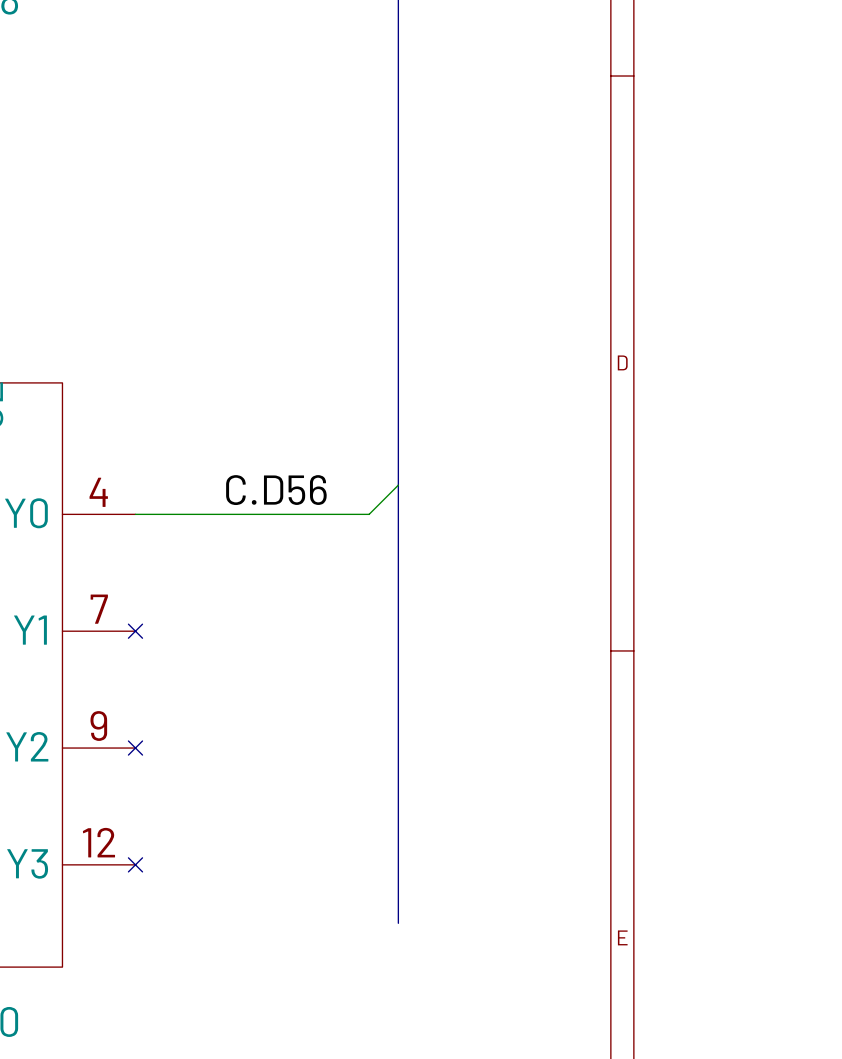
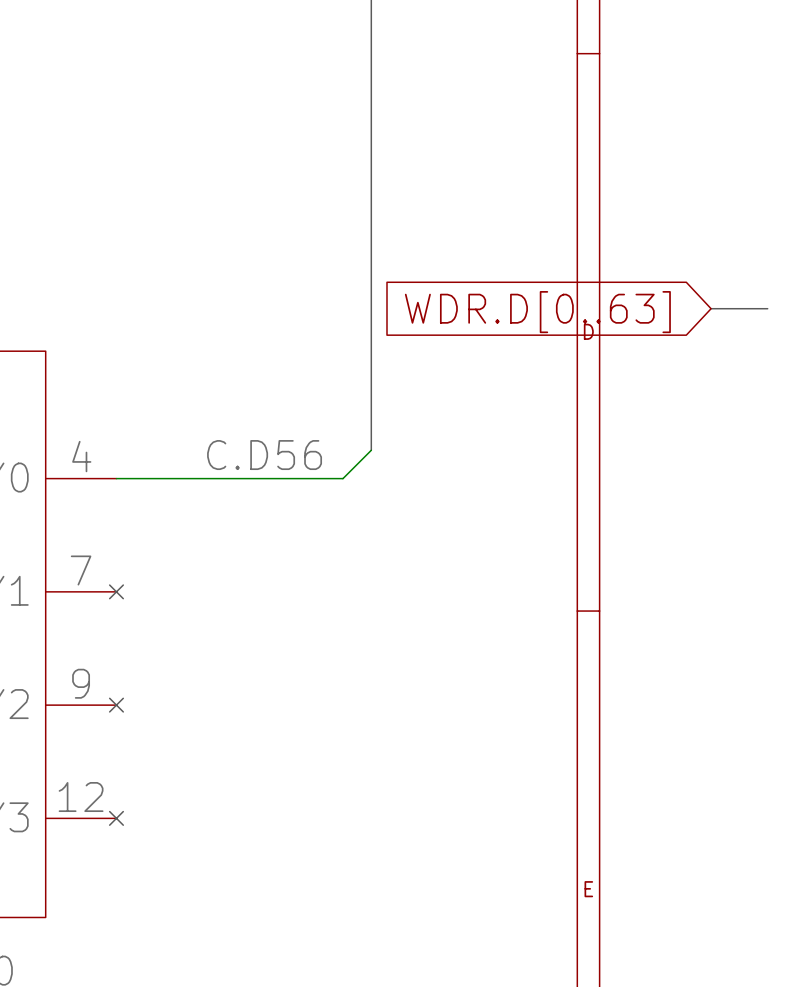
bus: none -> (711, 308) (767, 308)
global label: none -> WDR.D[0..63] (537, 312)
bus: (398, 485) (398, 923) -> none

